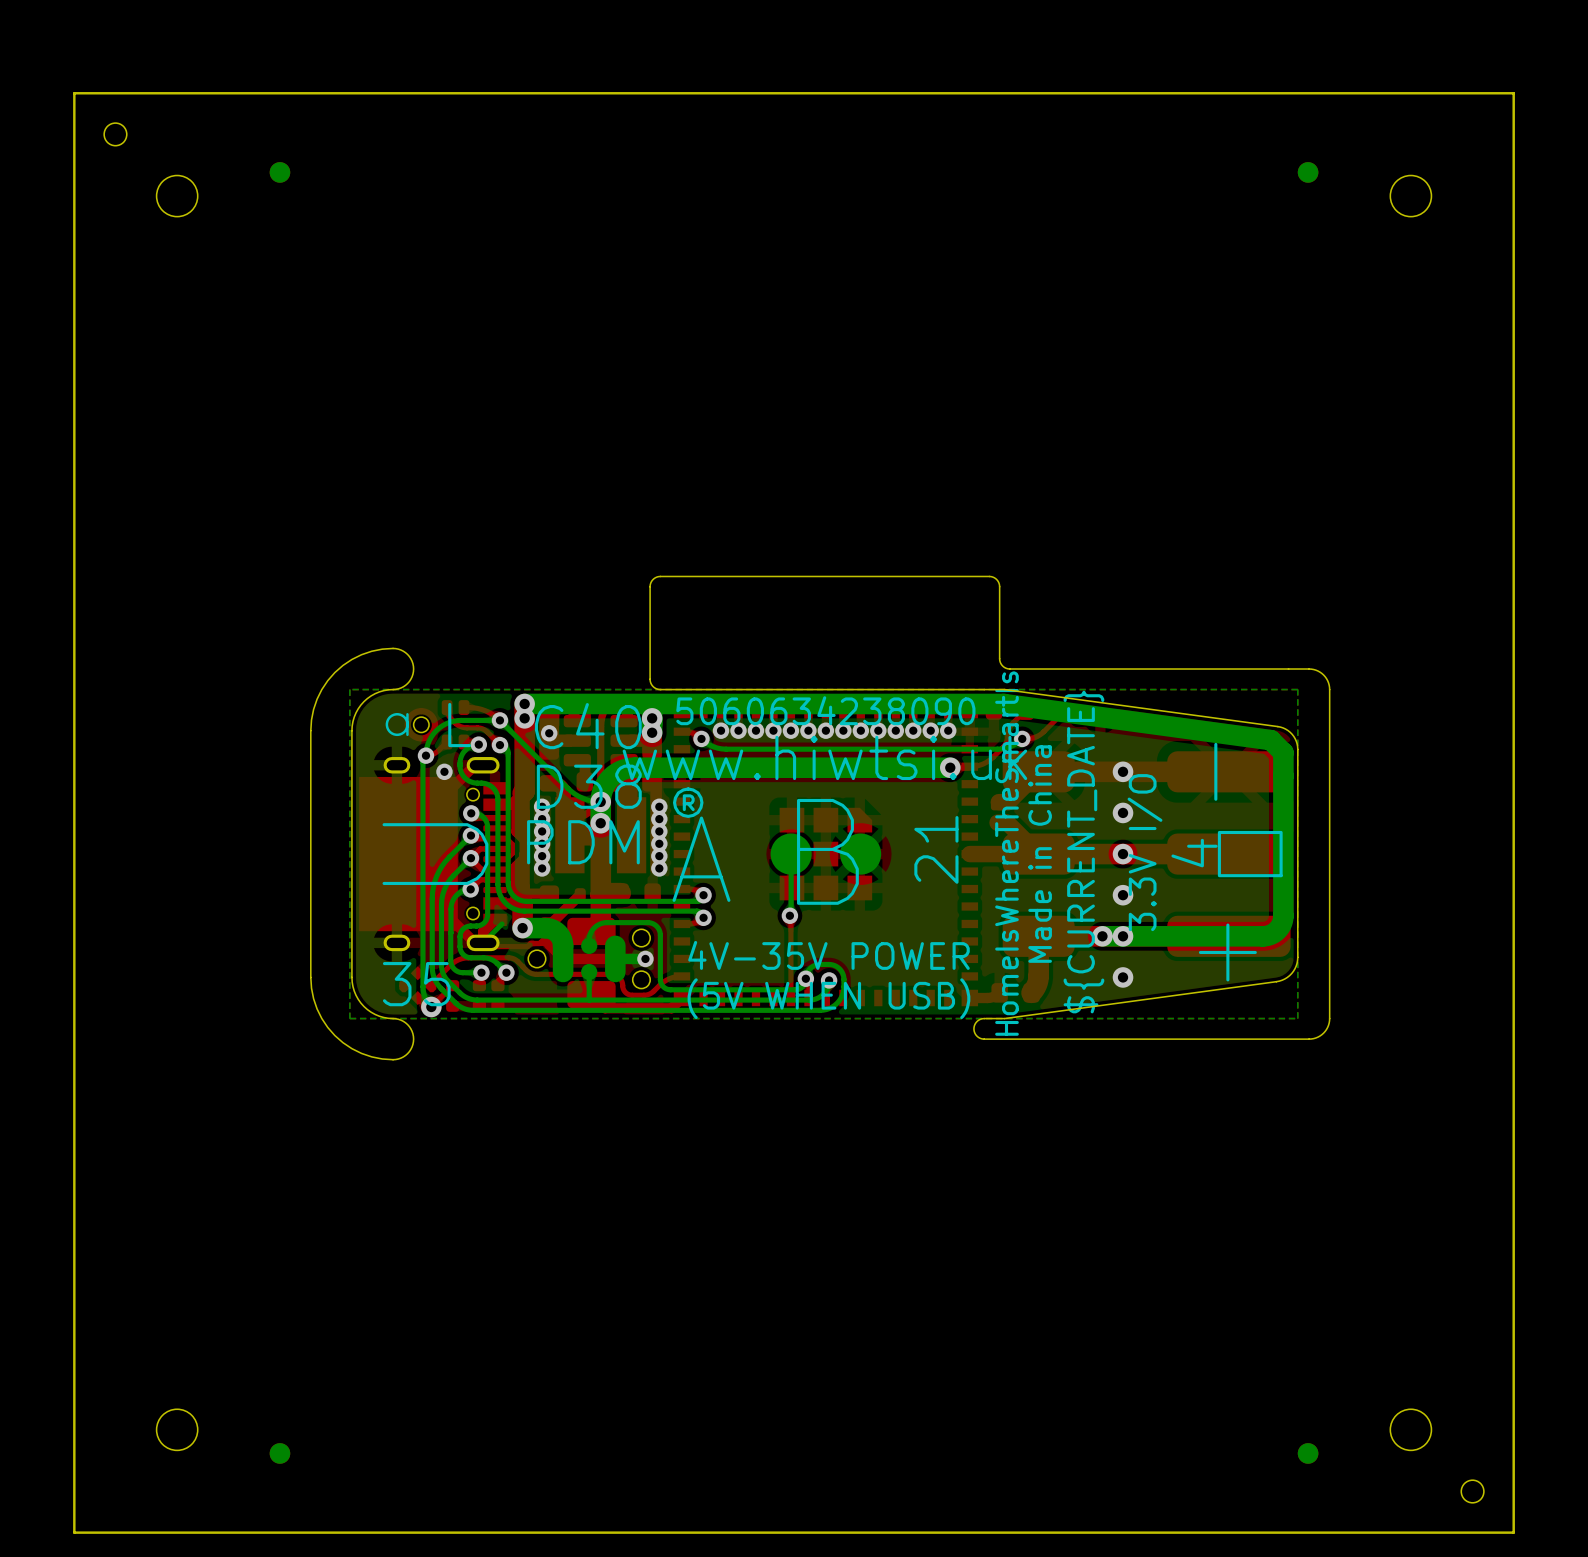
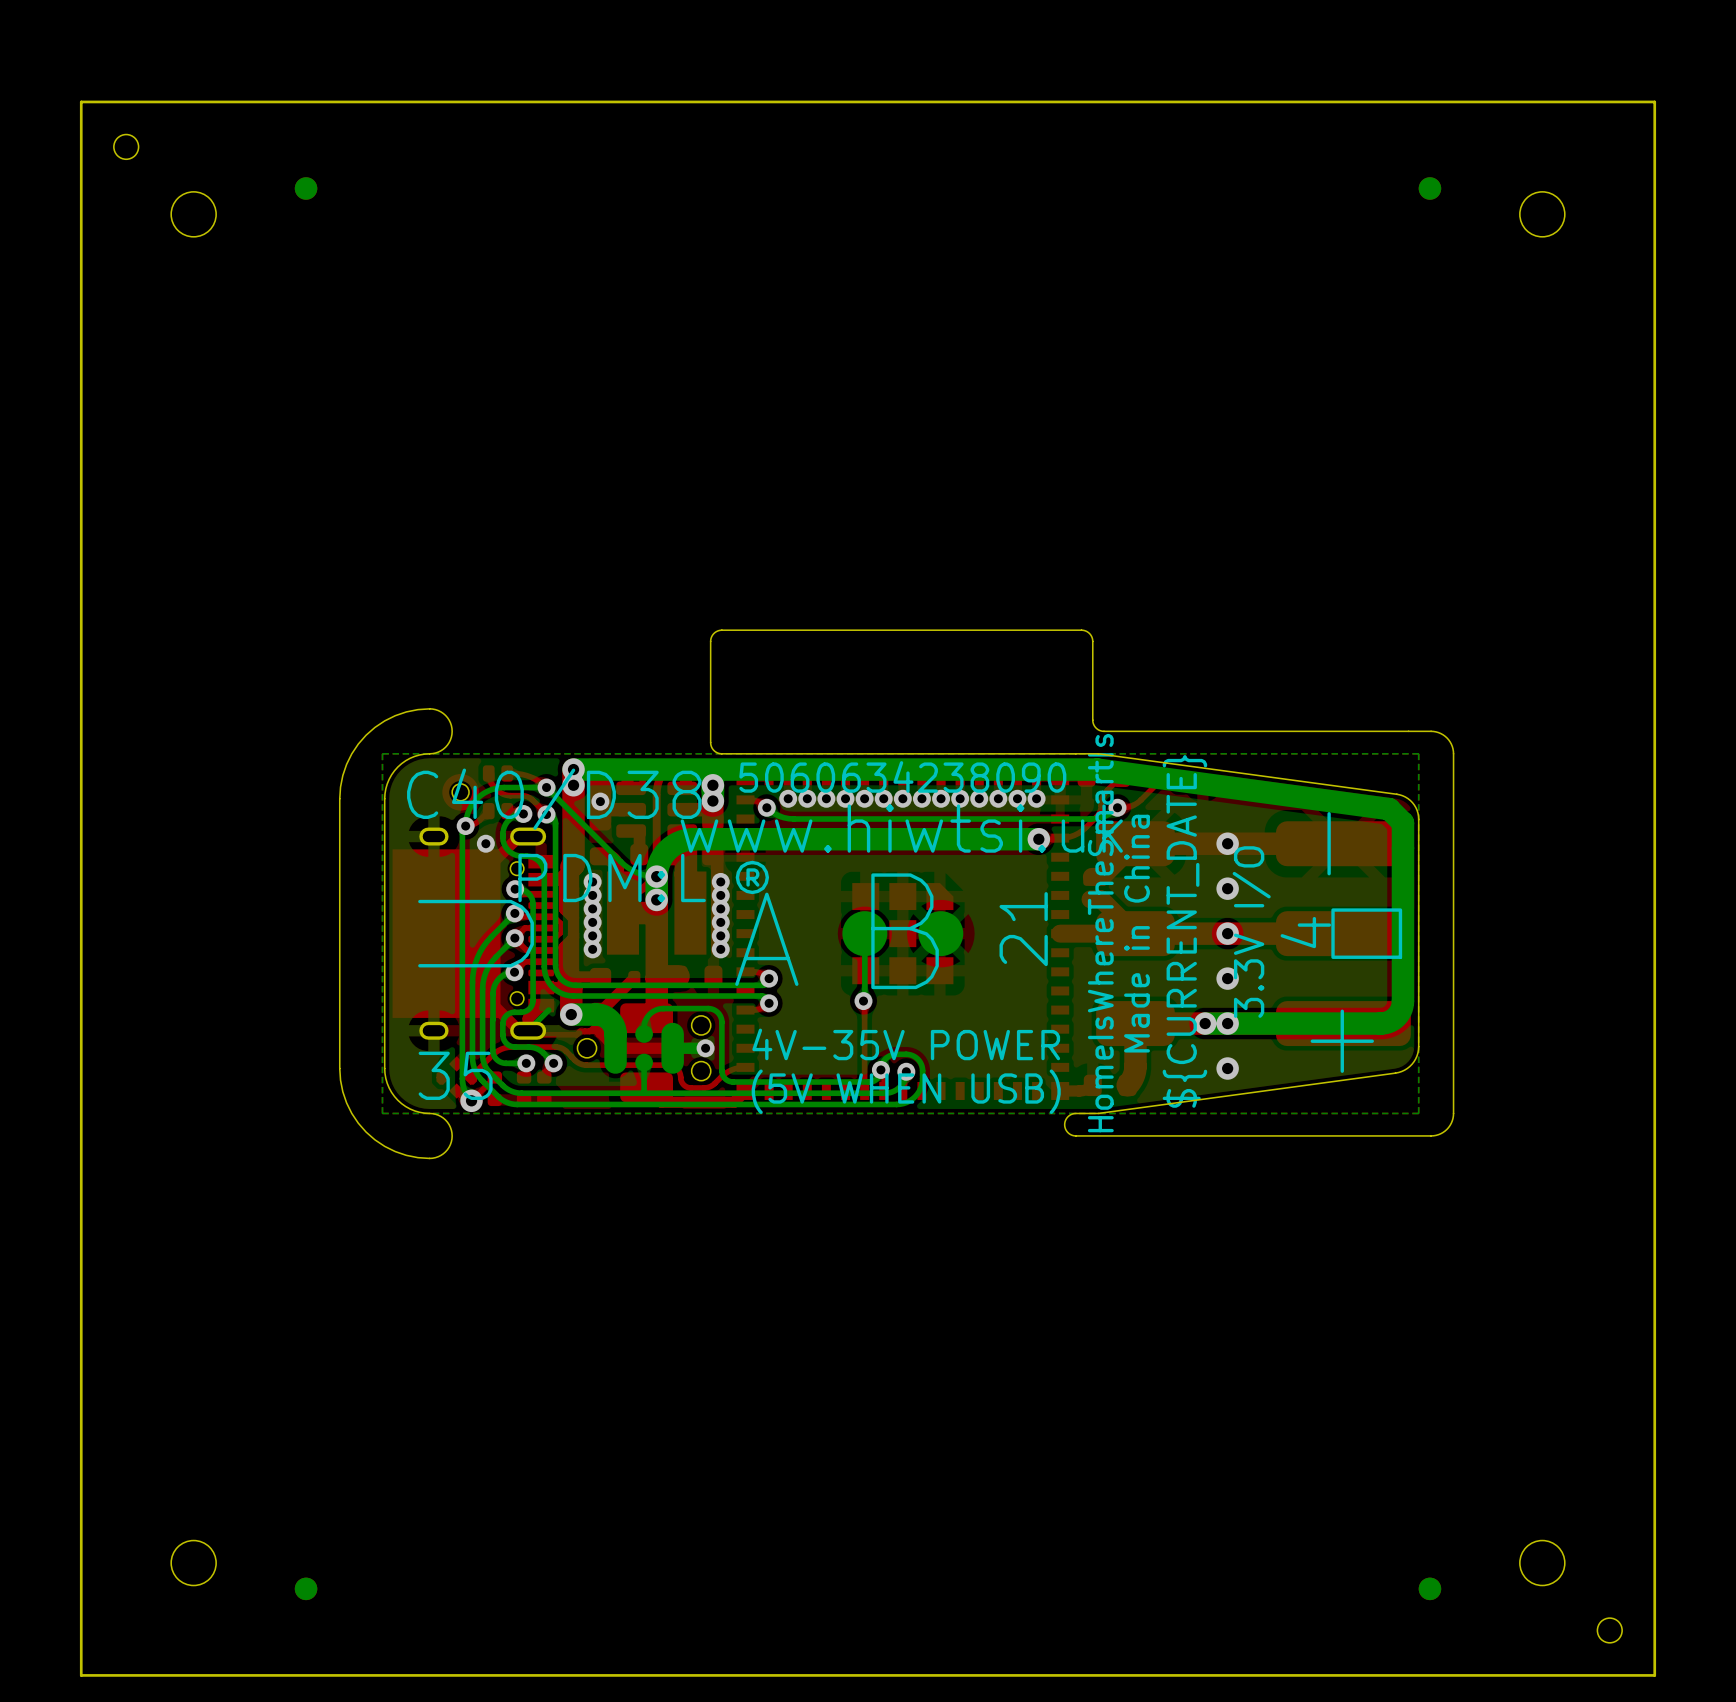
drawing: [385, 713, 409, 737] -> none
line: (407, 714) (407, 734) -> none
text: L (459, 725) -> none
text: C40 (588, 726) -> C40/D38 (554, 799)
text: D38 (589, 786) -> PDM:L (612, 878)
text: PDM (583, 842) -> none

